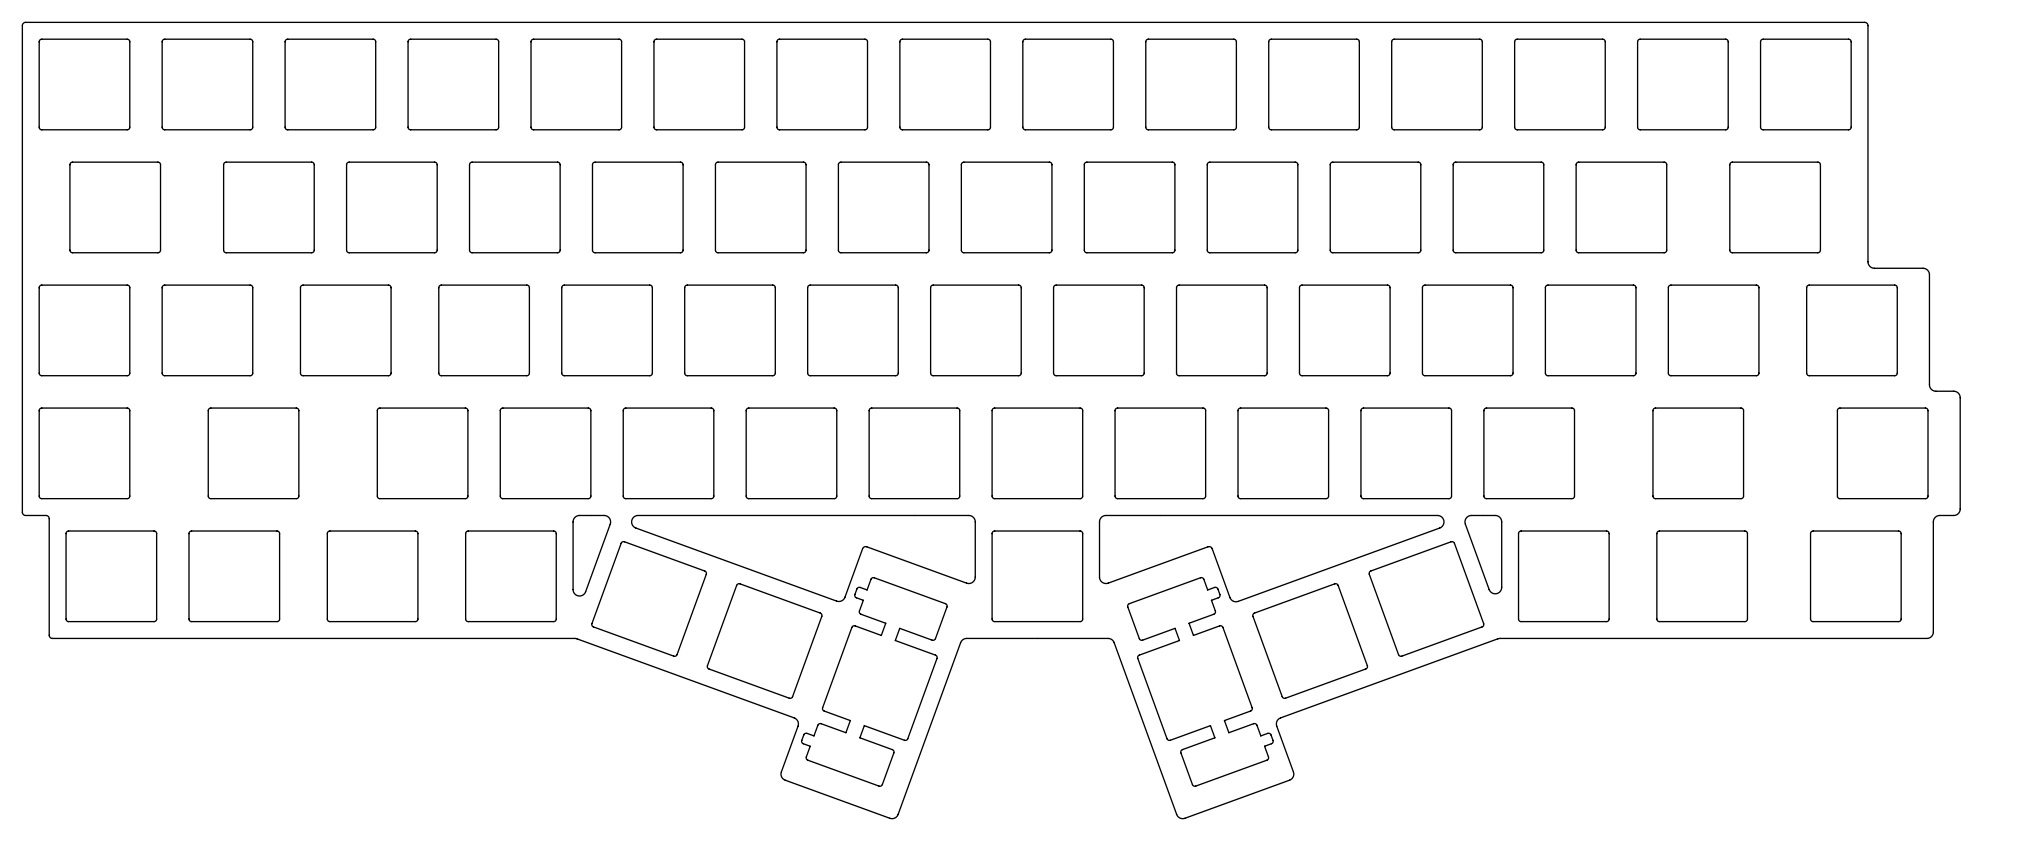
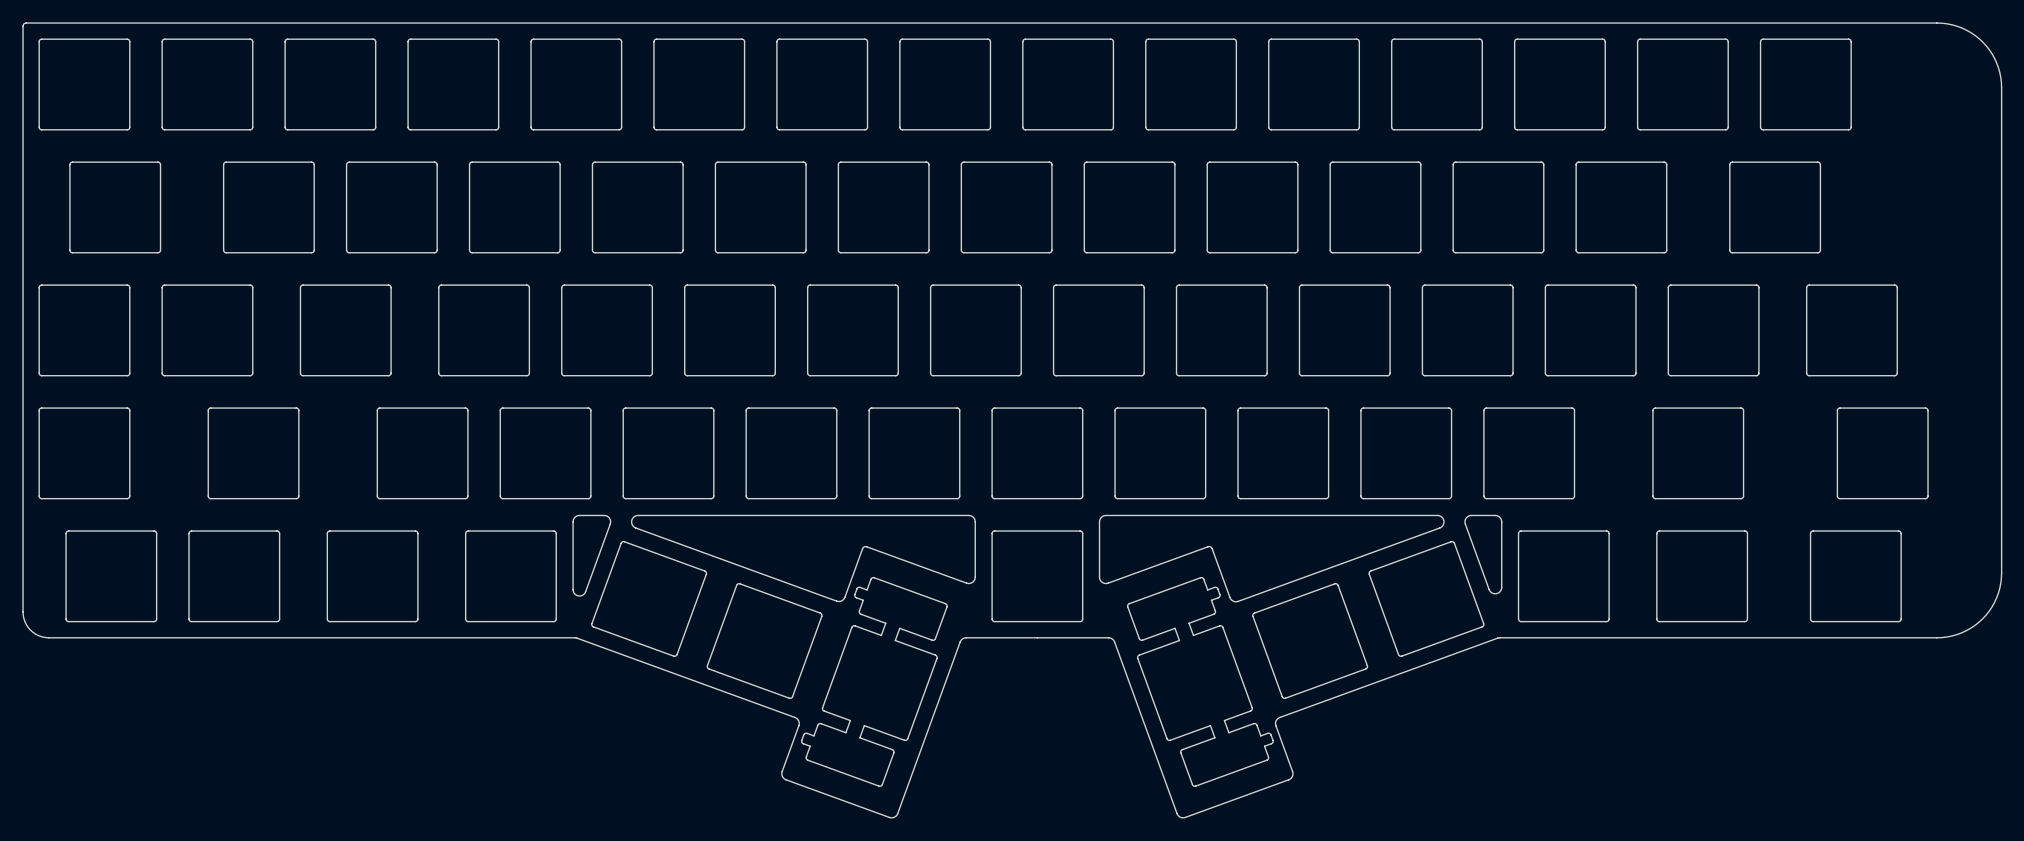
board edge: (1864, 22) (24, 22) (22, 25) (22, 512) (24, 515) (46, 515) (49, 517) (49, 636) (52, 638) (575, 638) (795, 718) (798, 725) (781, 772) (782, 778) (891, 818) (898, 814) (960, 642) (965, 638) (1108, 638) (1112, 640) (1176, 814) (1182, 818) (1291, 778) (1293, 772) (1276, 725) (1279, 718) (1498, 638) (1928, 638) (1933, 631) (1933, 520) (1938, 515) (1955, 515) (1960, 509) (1960, 396) (1955, 391) (1934, 391) (1929, 386) (1928, 271) (1922, 268) (1873, 268) (1868, 263) (1867, 25) (1864, 22) -> (1936, 23) (1961, 27) (1982, 41) (1996, 62) (2001, 87) (2001, 578) (1996, 597) (1986, 615) (1974, 625) (1956, 634) (1936, 637) (1498, 638) (1278, 718) (1275, 725) (1292, 772) (1291, 778) (1183, 817) (1177, 813) (1112, 639) (1108, 637) (965, 637) (960, 642) (897, 813) (891, 817) (783, 777) (782, 771) (799, 725) (796, 718) (576, 638) (48, 637) (33, 632) (23, 618) (23, 26) (25, 23) (1936, 23)

